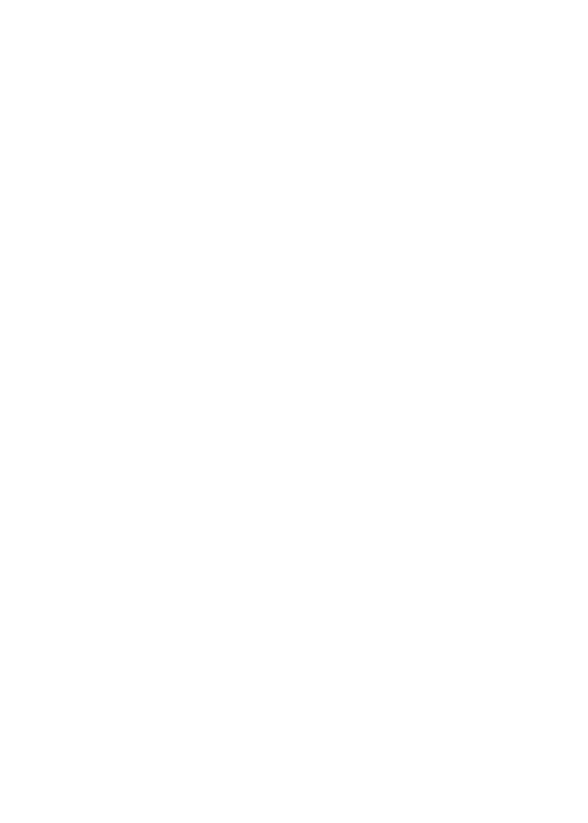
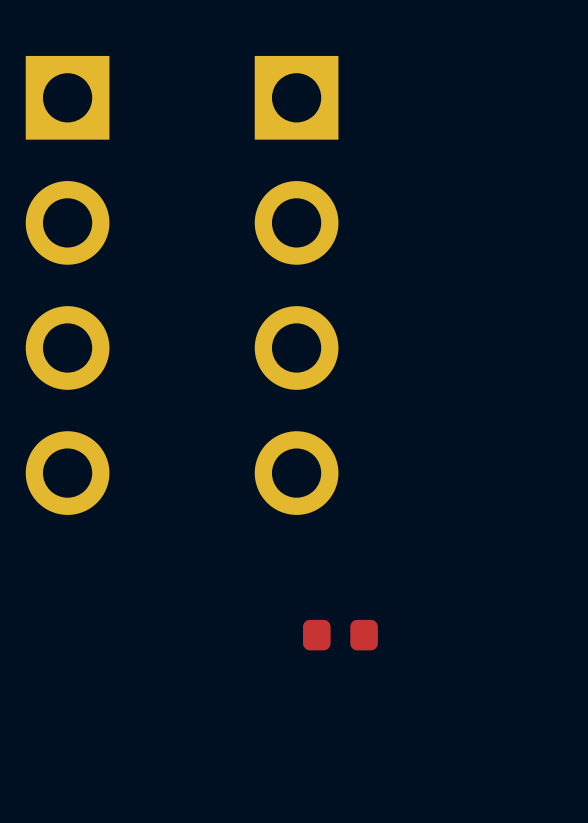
part: none -> (67, 285)
part: none -> (296, 285)
part: none -> (340, 635)

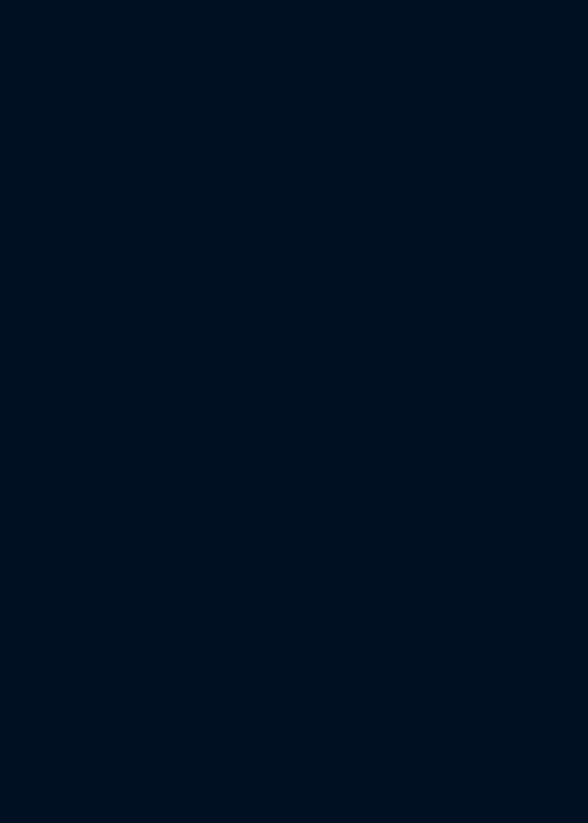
part: (67, 285) -> none
part: (296, 285) -> none
part: (340, 635) -> none

